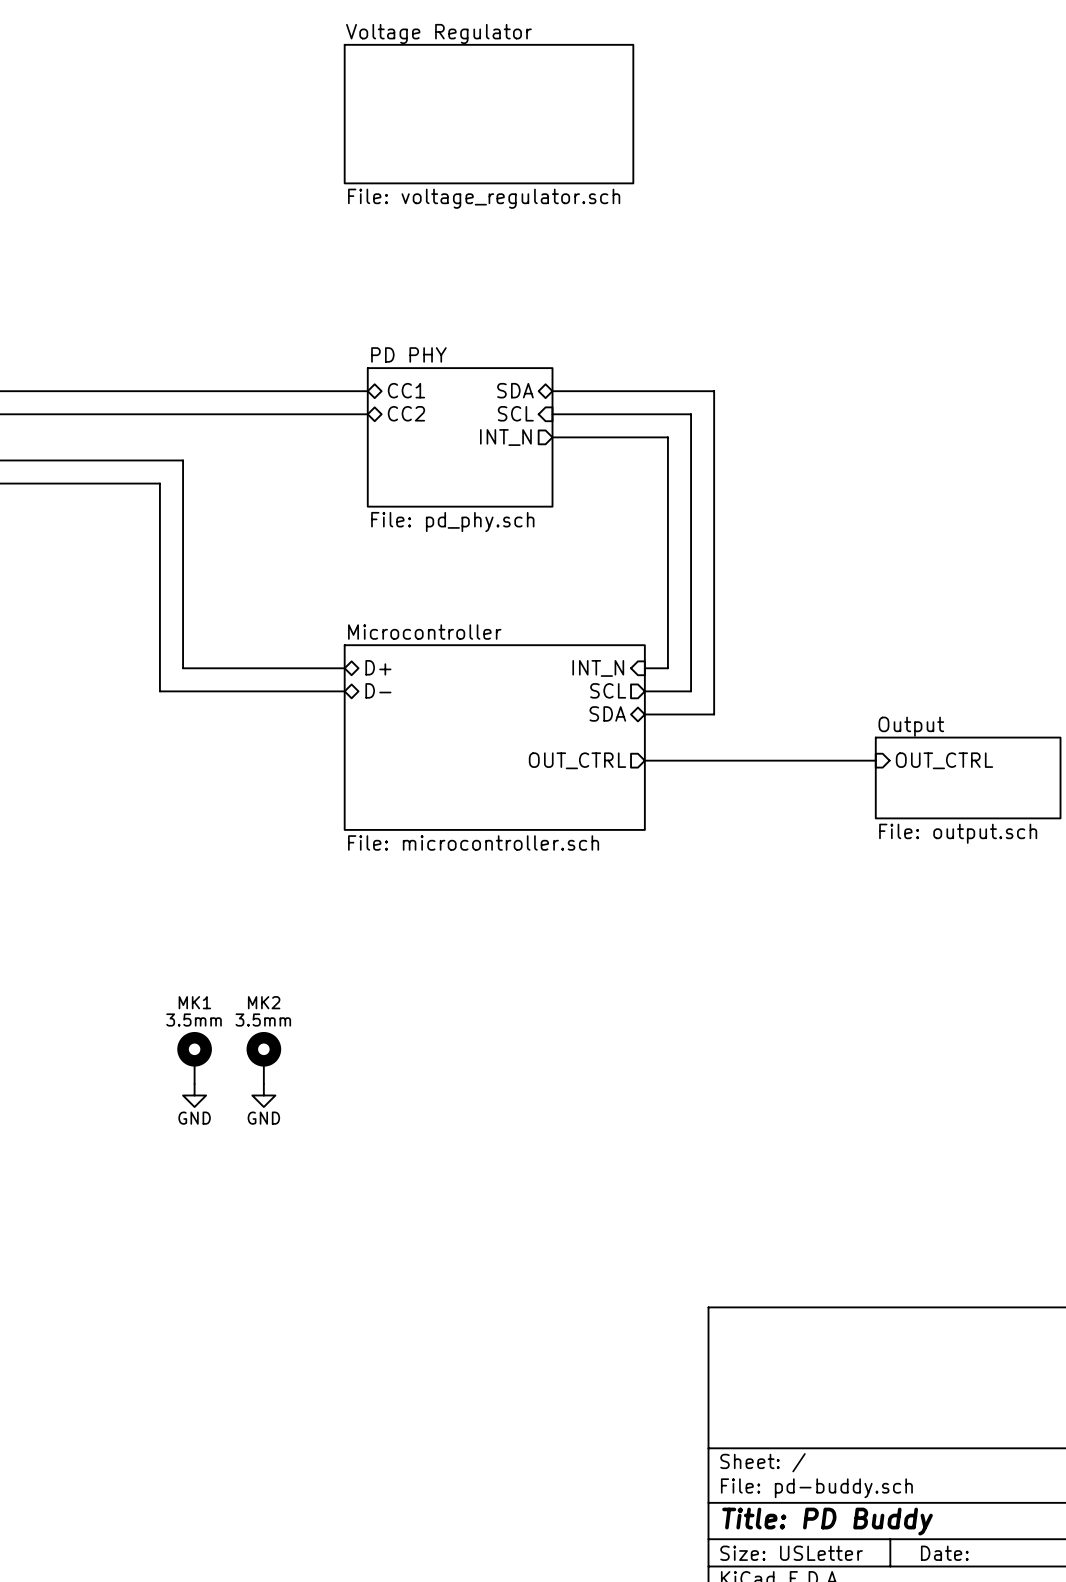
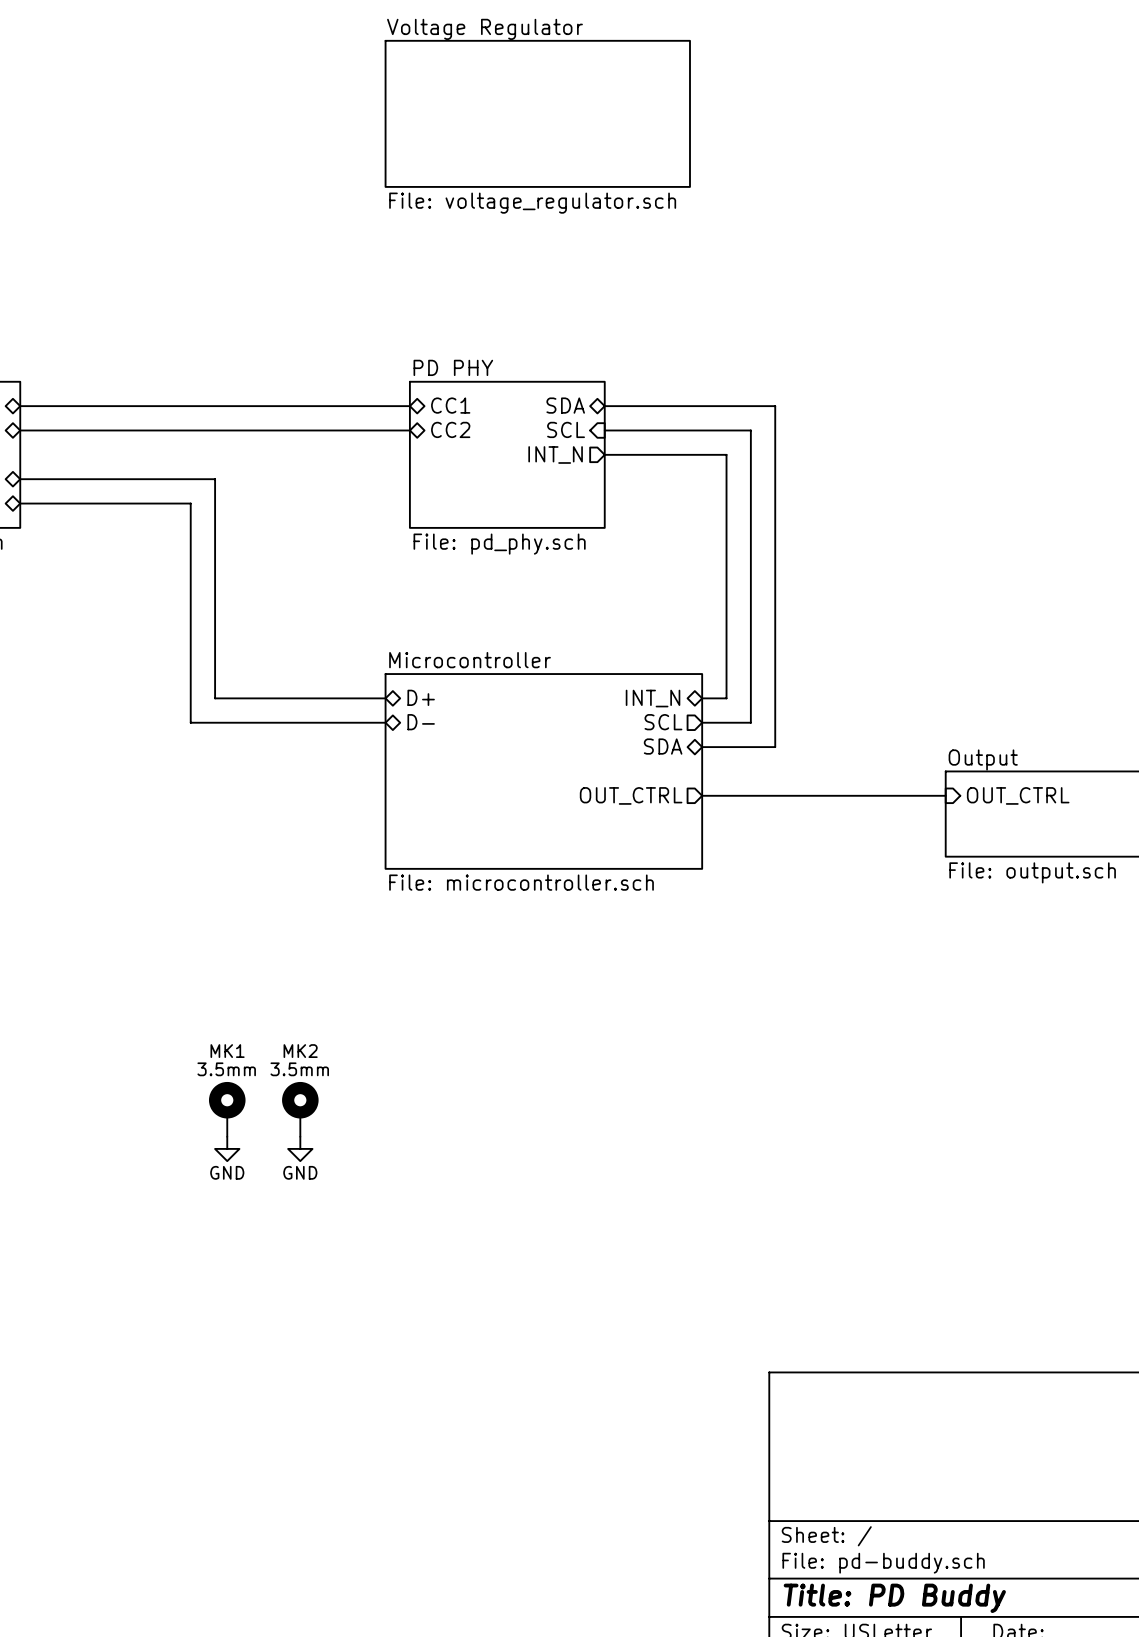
sheet pin shape: input (598, 668) -> bidirectional (653, 698)

